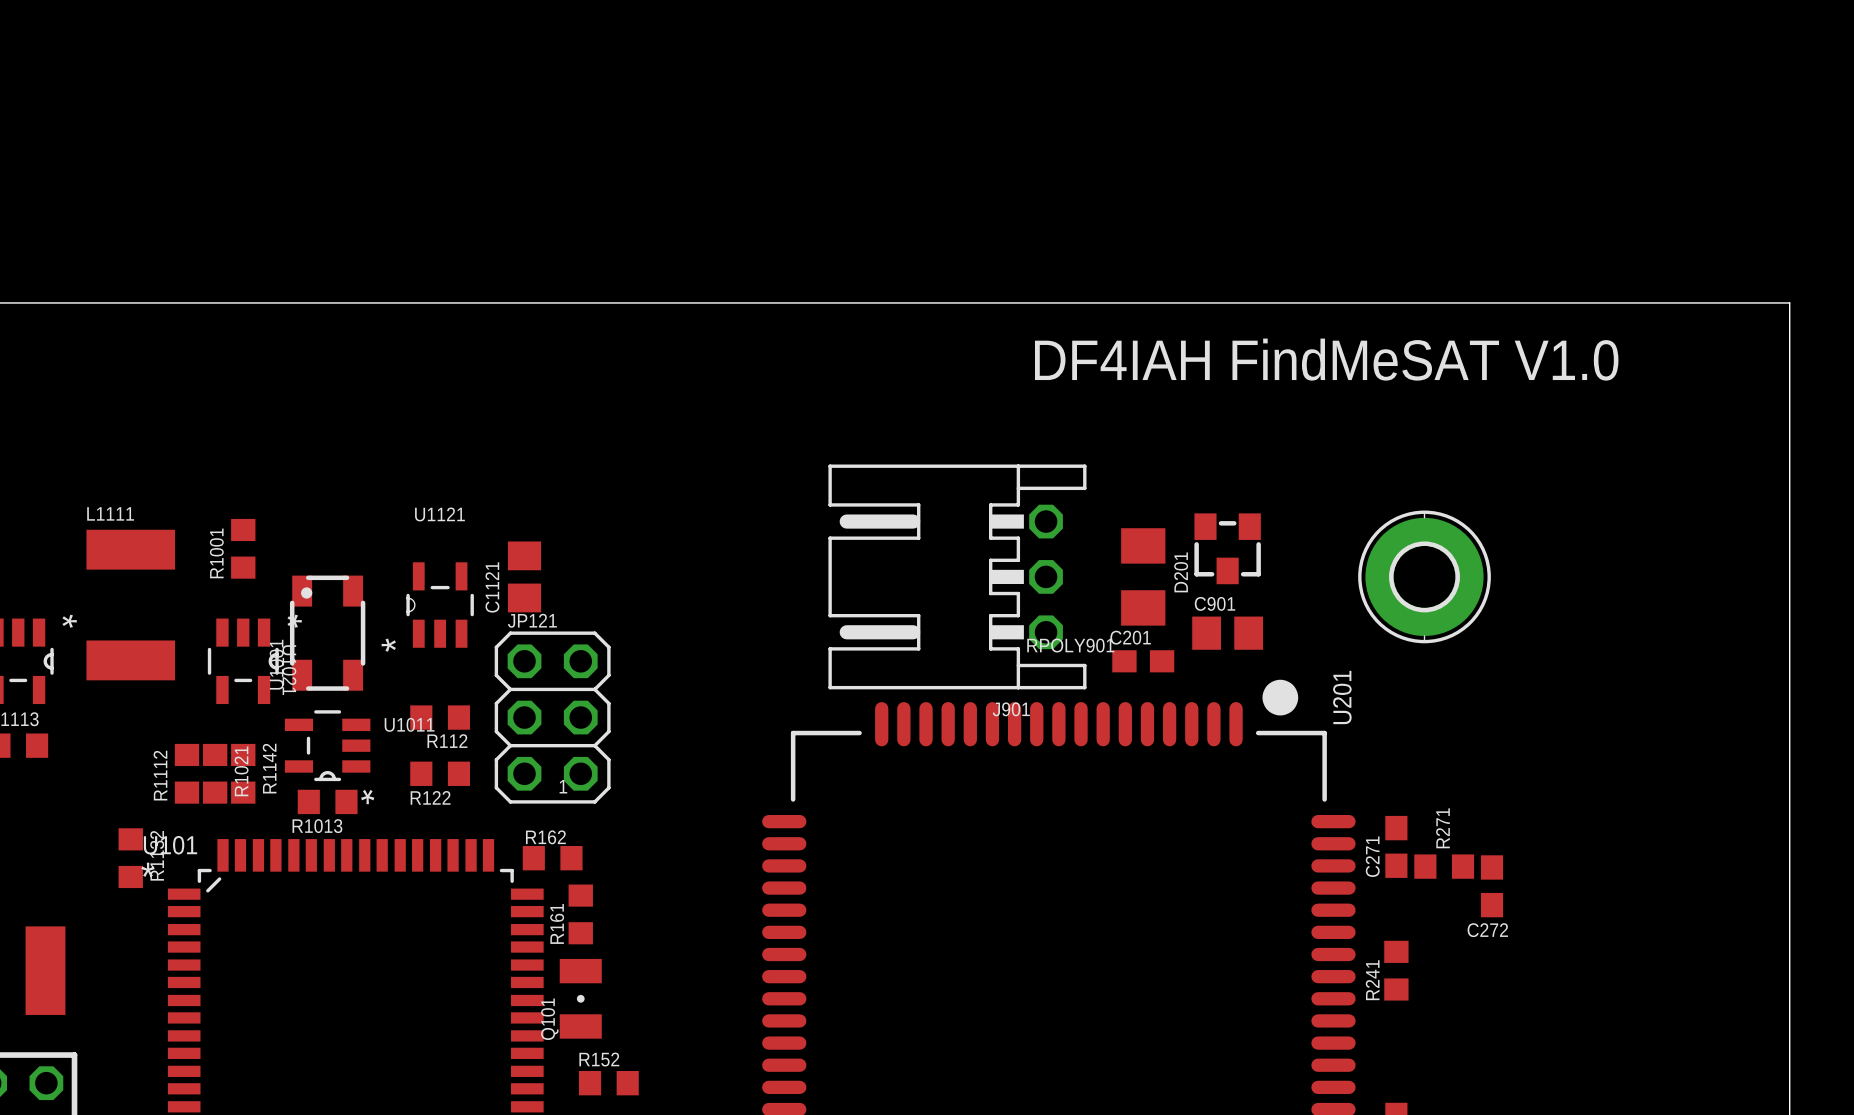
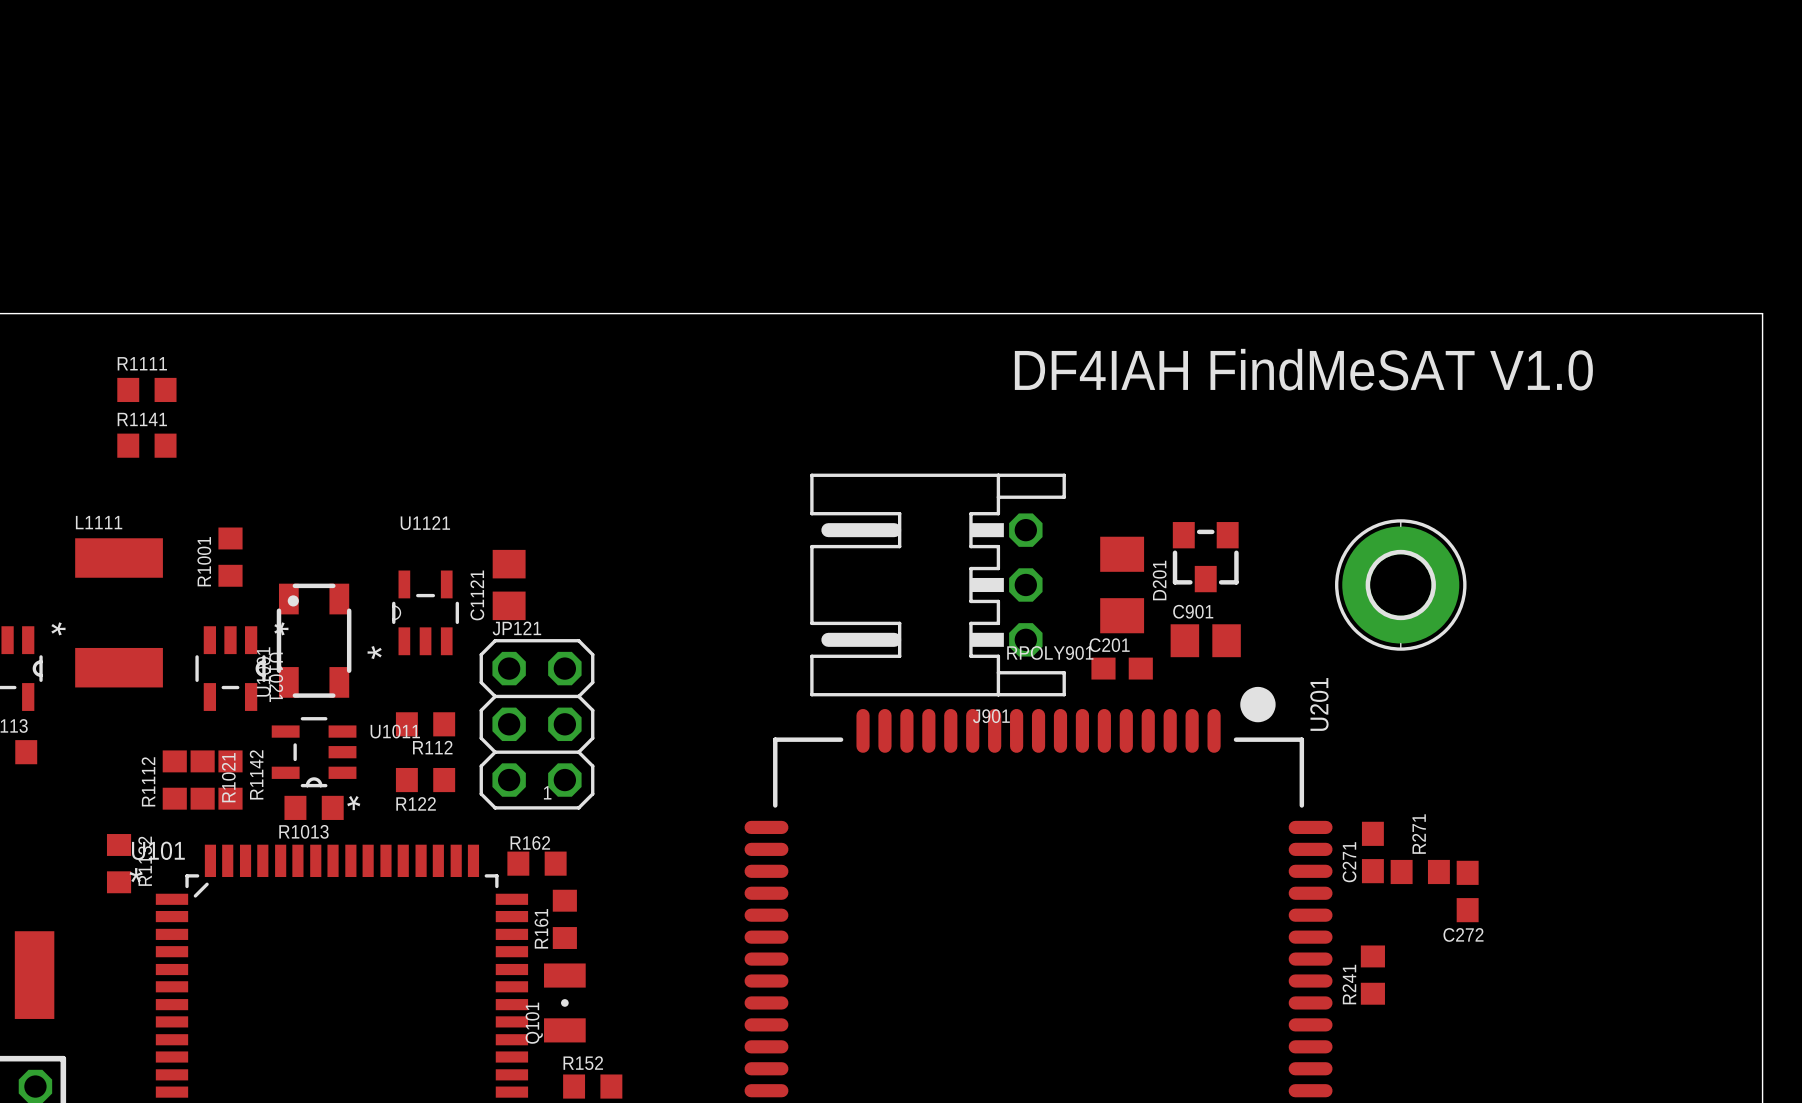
R1111: none -> (146, 389)
R1141: none -> (146, 445)

